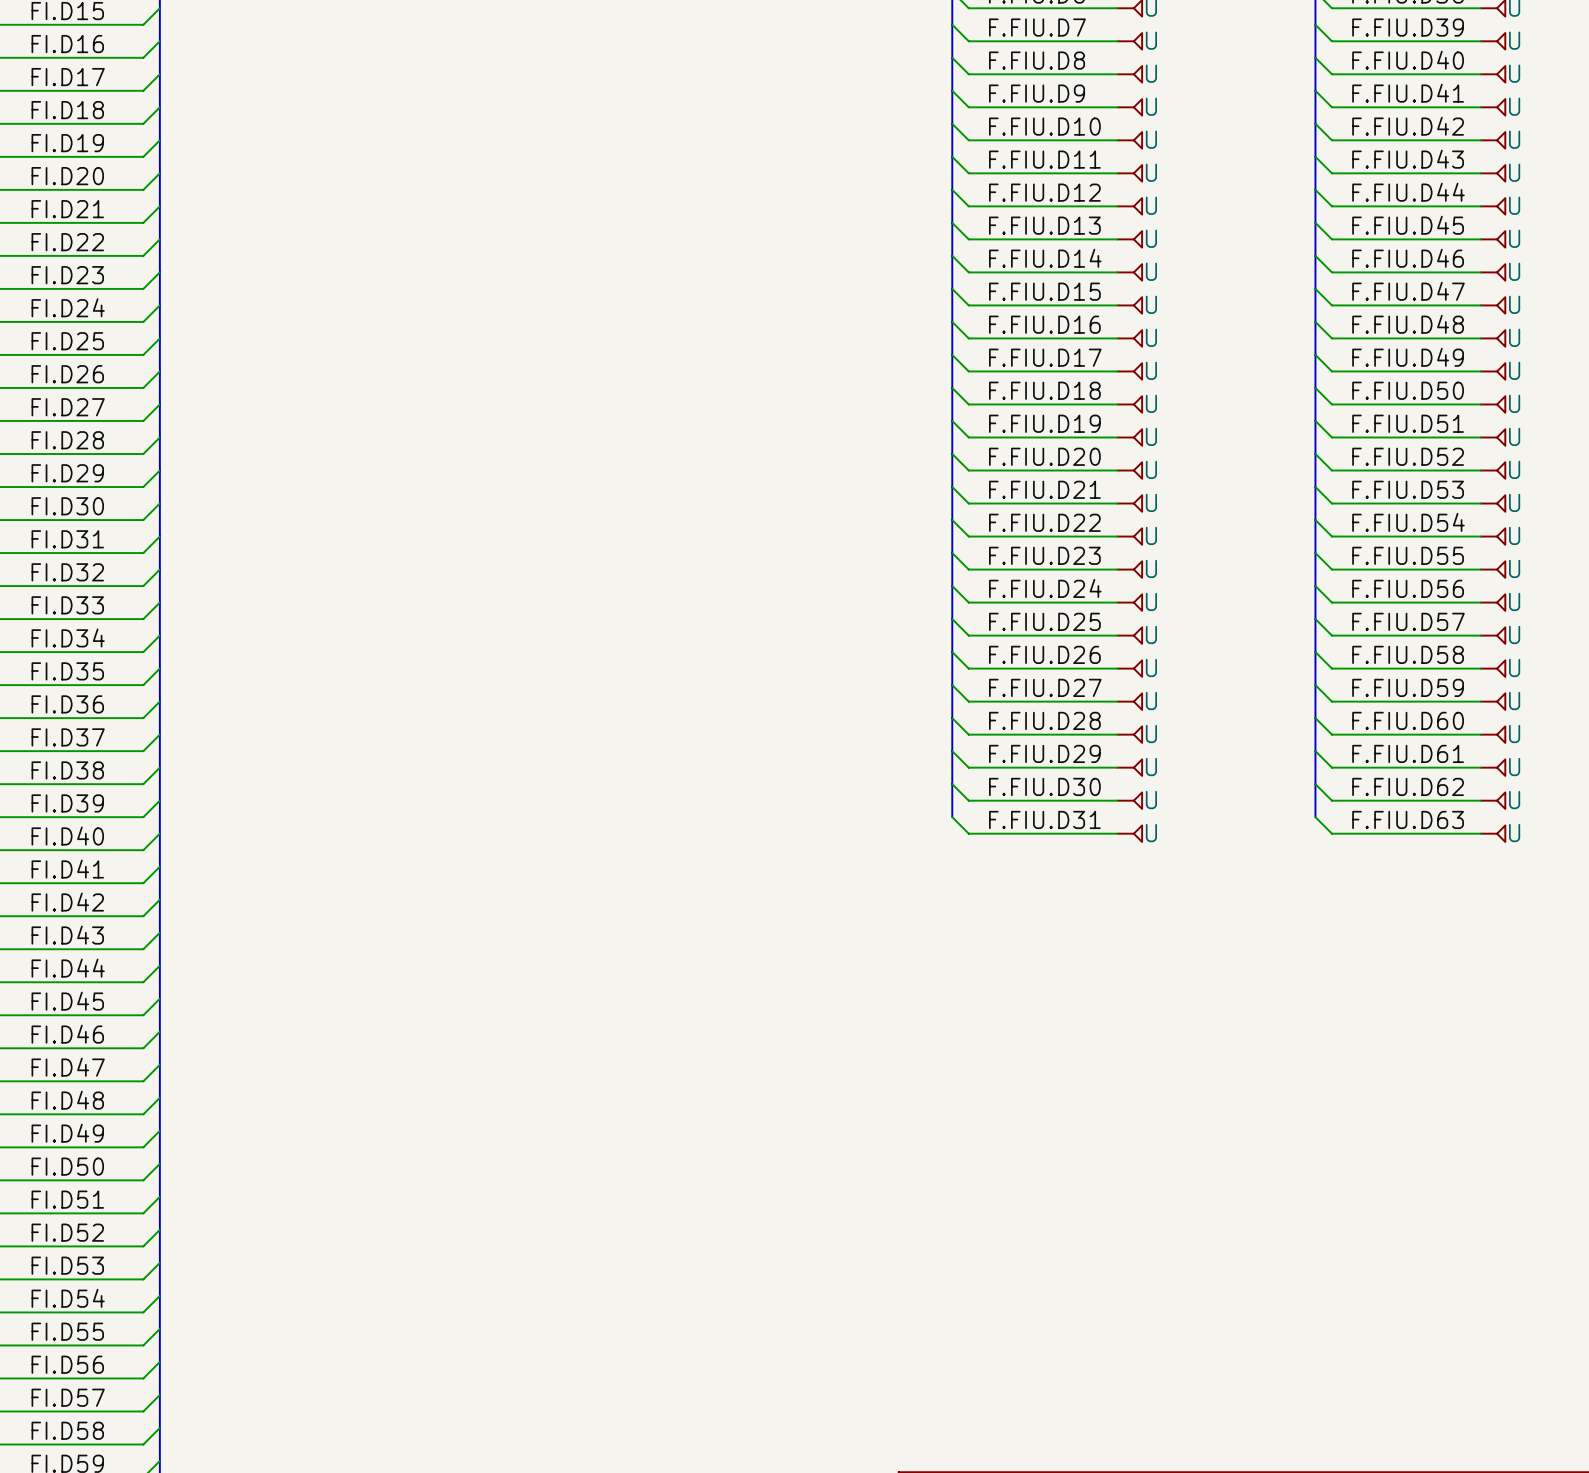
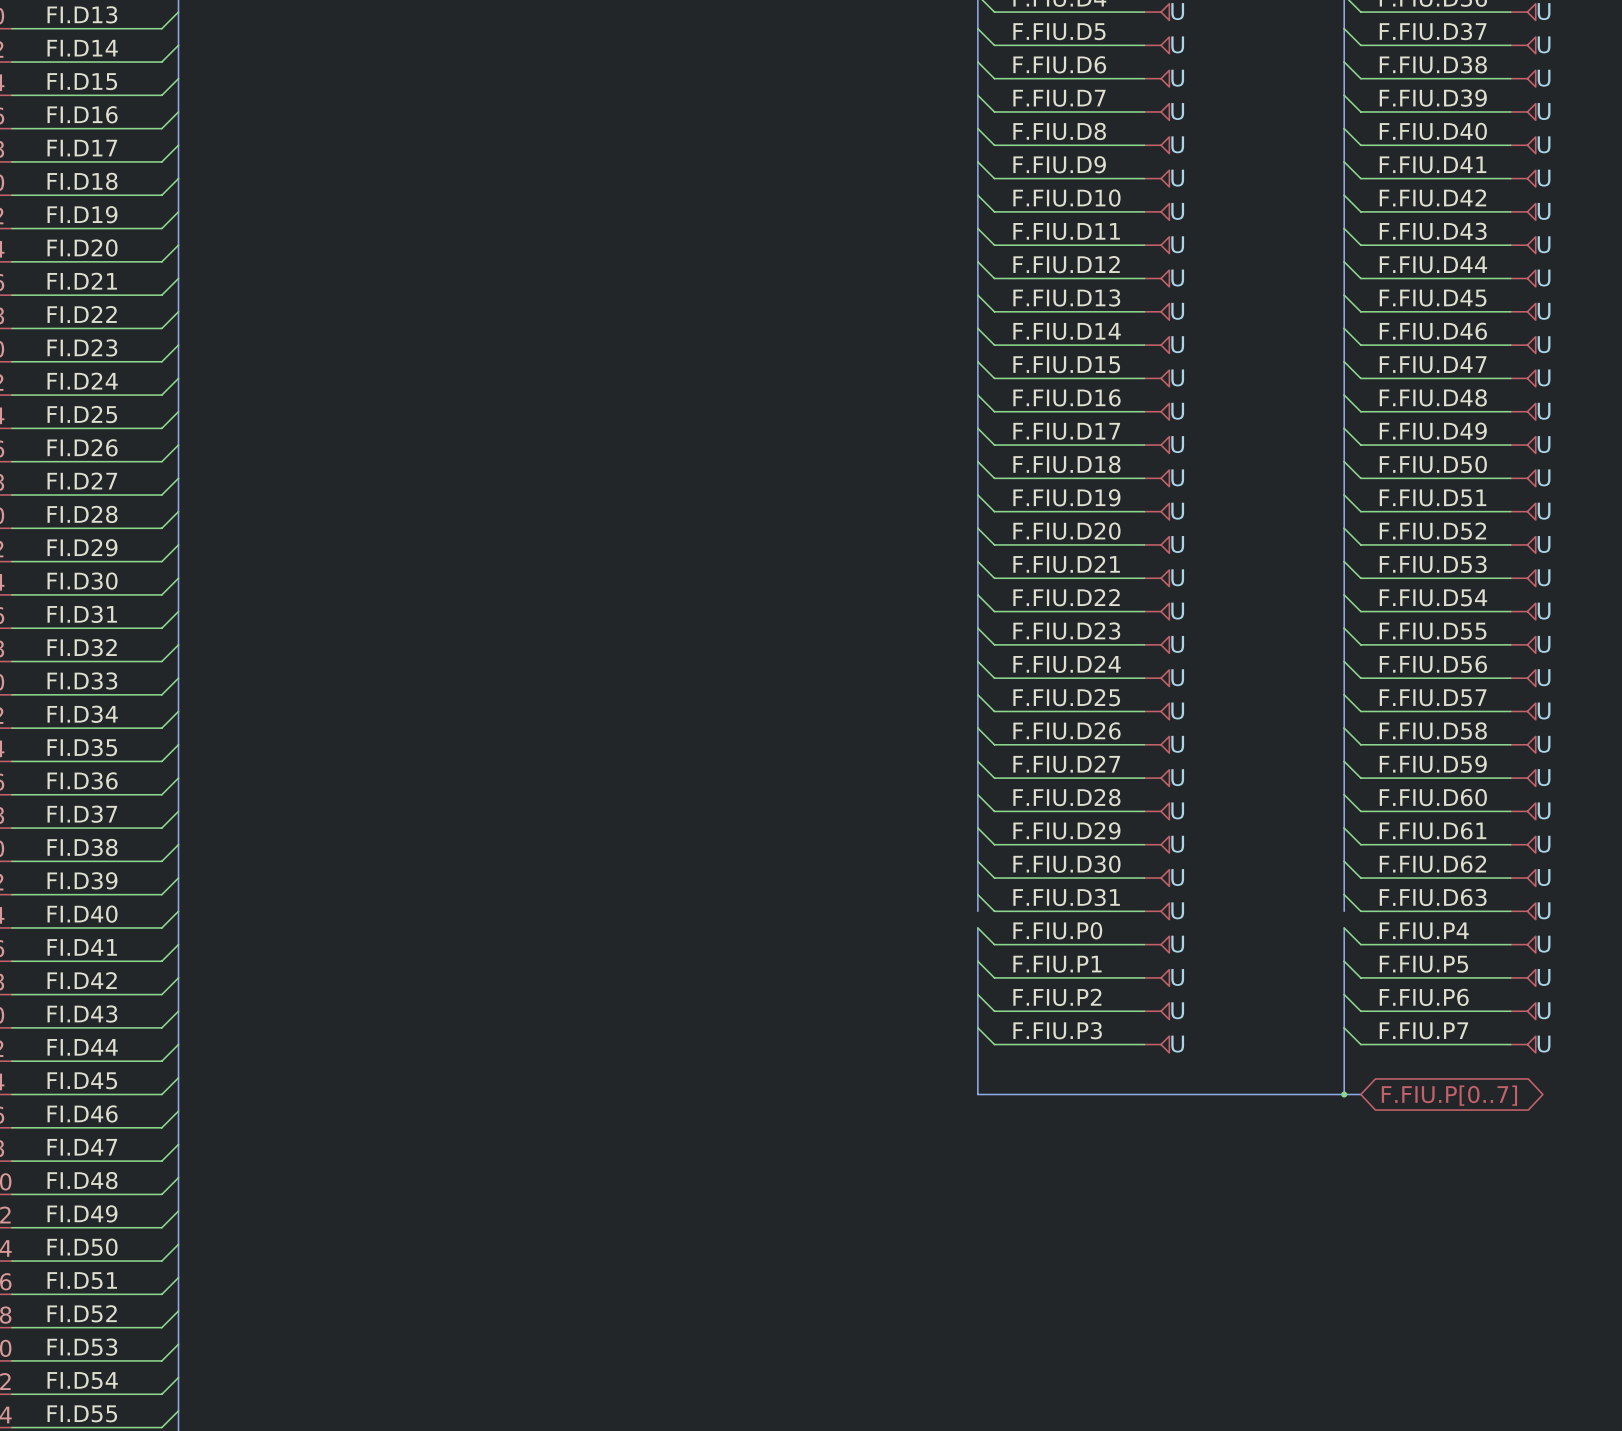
bus: none -> (977, 894) (977, 911)
bus: none -> (1344, 894) (1344, 911)
wire: none -> (977, 927) (994, 944) (1144, 944)
bus: none -> (977, 927) (977, 1094) (1360, 1094)
wire: none -> (1344, 927) (1360, 944) (1510, 944)
bus: none -> (1344, 927) (1344, 1094)
label: none -> F.FIU.P0 (1057, 930)
label: none -> F.FIU.P4 (1424, 930)
U: none -> (1157, 944)
U: none -> (1523, 944)
wire: none -> (977, 961) (994, 977) (1144, 977)
wire: none -> (1344, 961) (1360, 977) (1510, 977)
label: none -> F.FIU.P1 (1057, 964)
label: none -> F.FIU.P5 (1423, 964)
U: none -> (1157, 977)
U: none -> (1523, 977)
wire: none -> (977, 994) (994, 1011) (1144, 1011)
wire: none -> (1344, 994) (1360, 1011) (1510, 1011)
label: none -> F.FIU.P2 (1057, 997)
label: none -> F.FIU.P6 (1424, 997)
U: none -> (1157, 1011)
U: none -> (1523, 1011)
wire: none -> (977, 1027) (994, 1044) (1144, 1044)
wire: none -> (1344, 1027) (1360, 1044) (1510, 1044)
label: none -> F.FIU.P3 (1057, 1030)
label: none -> F.FIU.P7 (1423, 1030)
U: none -> (1157, 1044)
U: none -> (1523, 1044)
junction: none -> (1344, 1094)
global label: none -> F.FIU.P[0..7] (1449, 1095)

